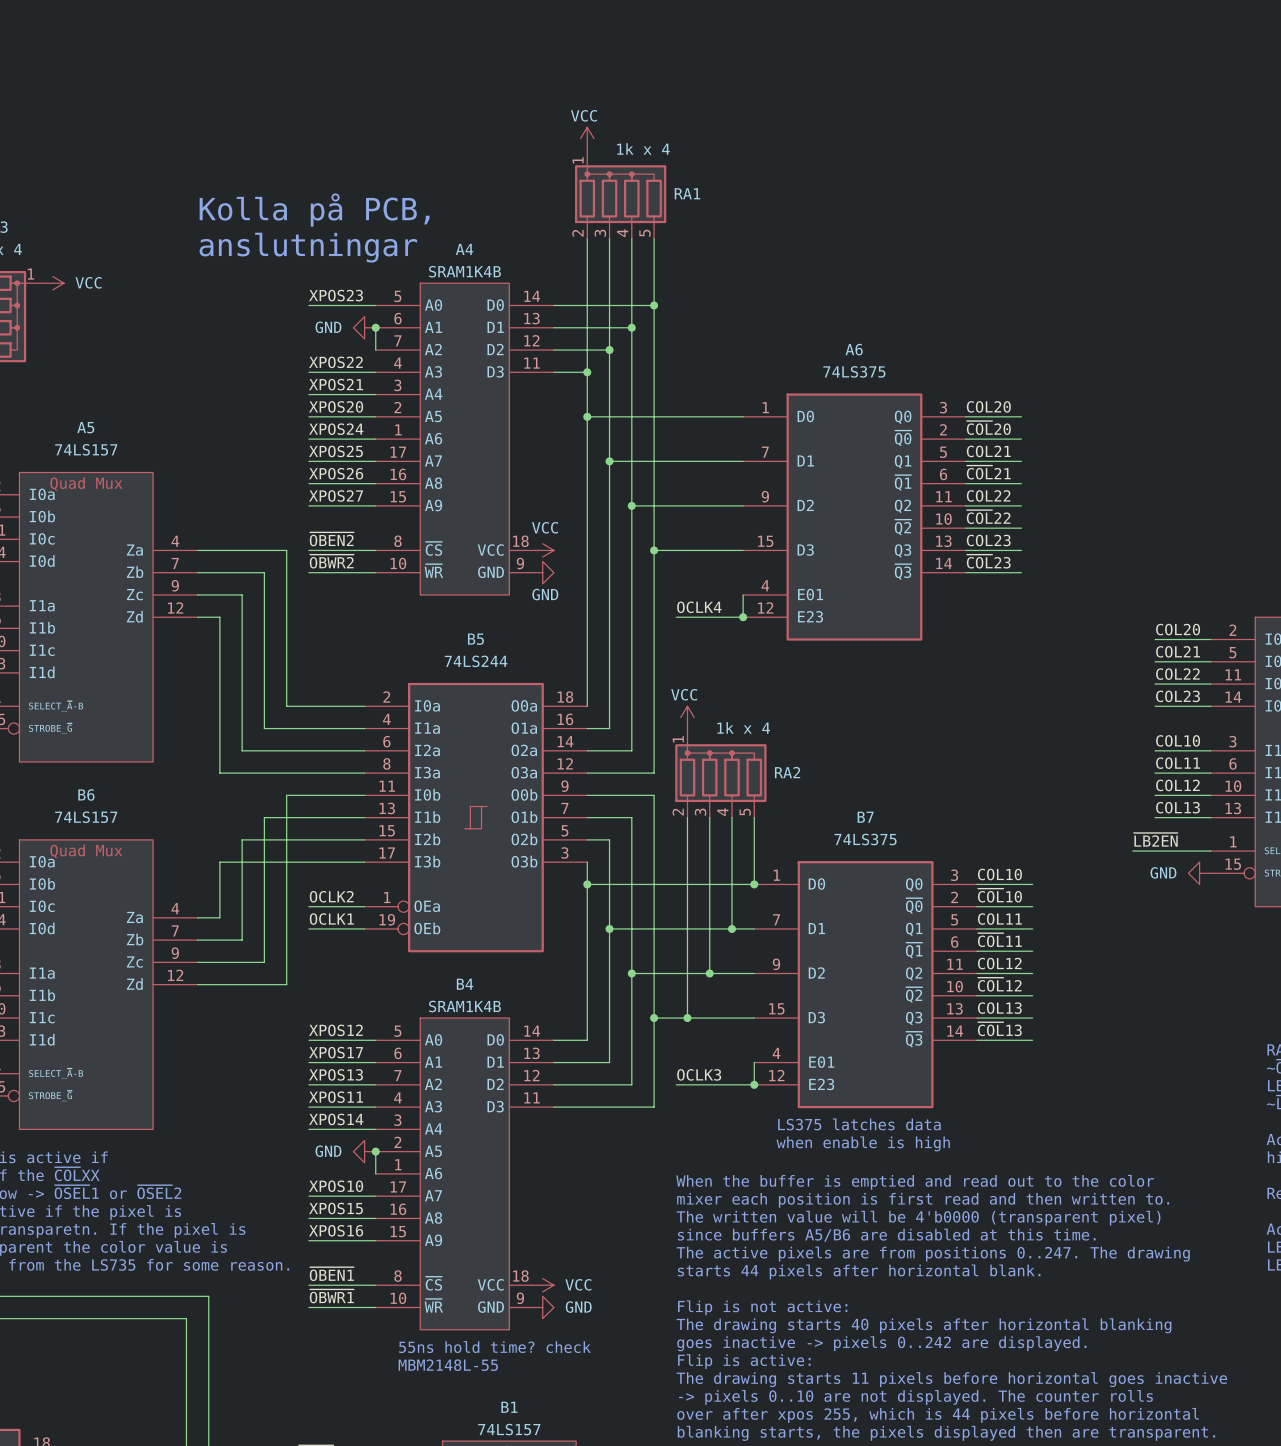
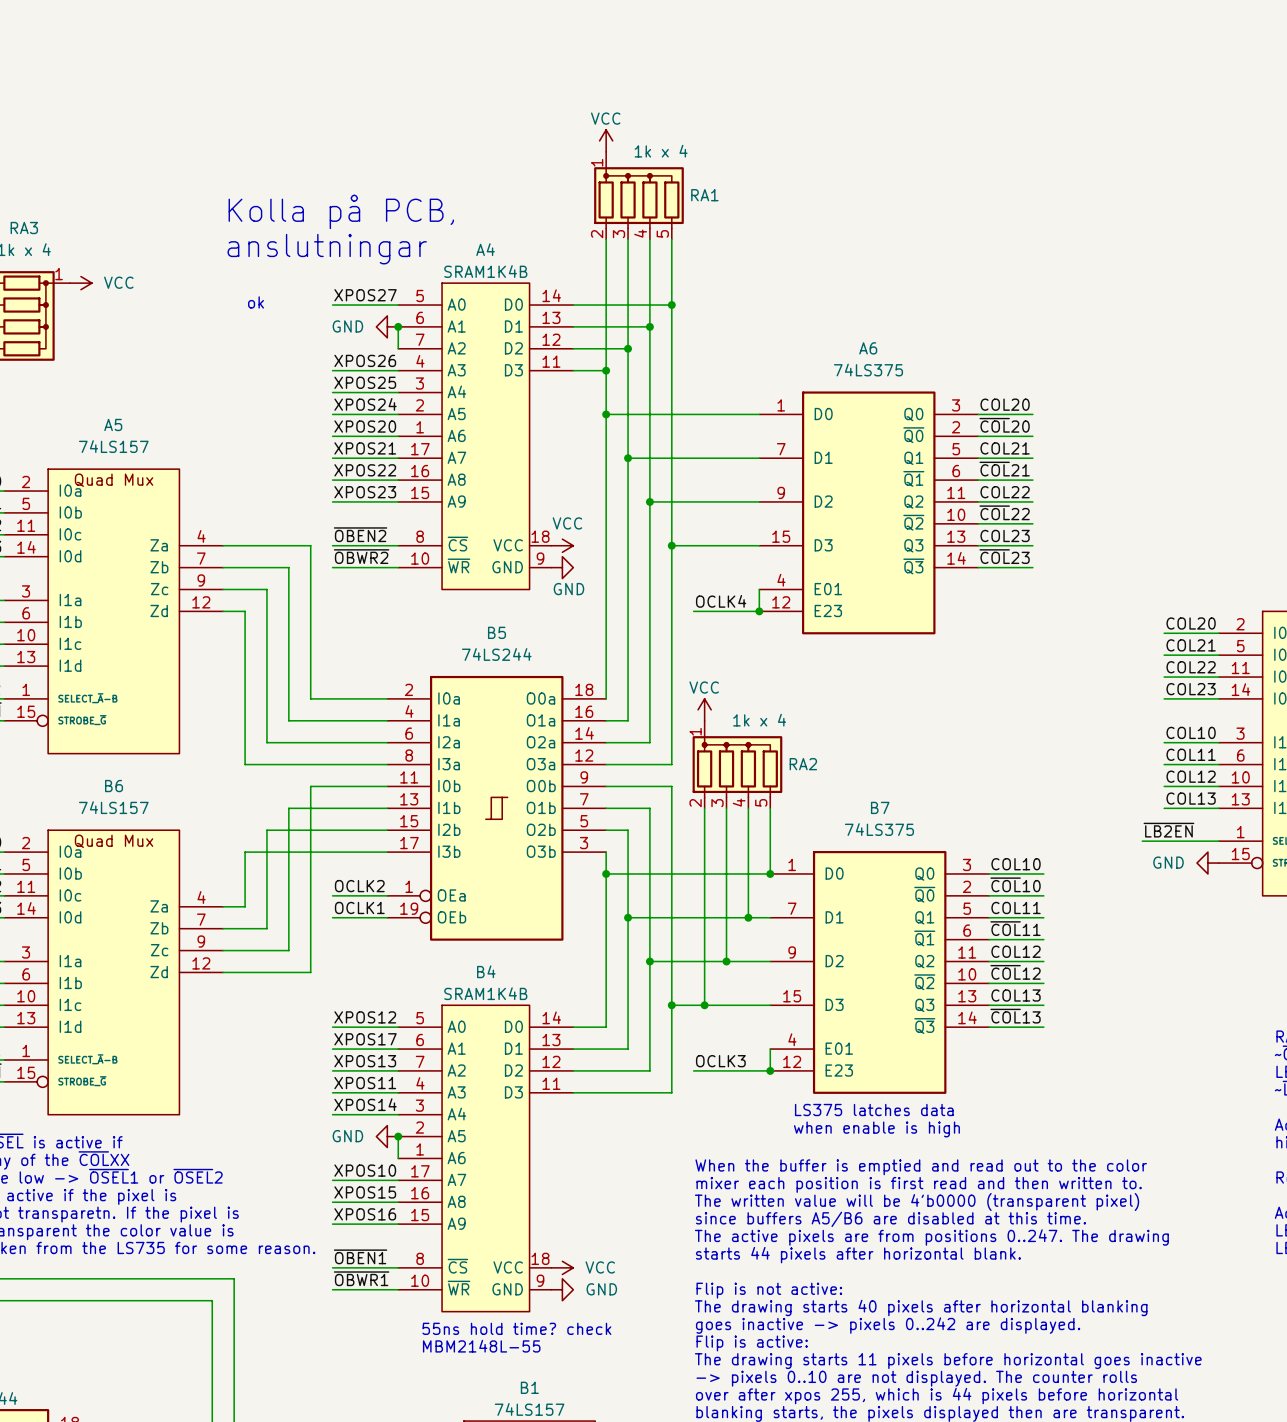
label: XPOS23 (336, 295) -> XPOS27 (365, 295)
text: none -> ok (256, 302)
label: XPOS22 (335, 362) -> XPOS26 (365, 360)
label: XPOS21 (336, 384) -> XPOS25 (365, 382)
label: XPOS20 (336, 406) -> XPOS24 (365, 404)
label: XPOS24 (336, 429) -> XPOS20 (365, 426)
label: XPOS25 (335, 451) -> XPOS21 (365, 448)
label: XPOS26 (336, 473) -> XPOS22 (365, 470)
label: XPOS27 (336, 495) -> XPOS23 (365, 492)

